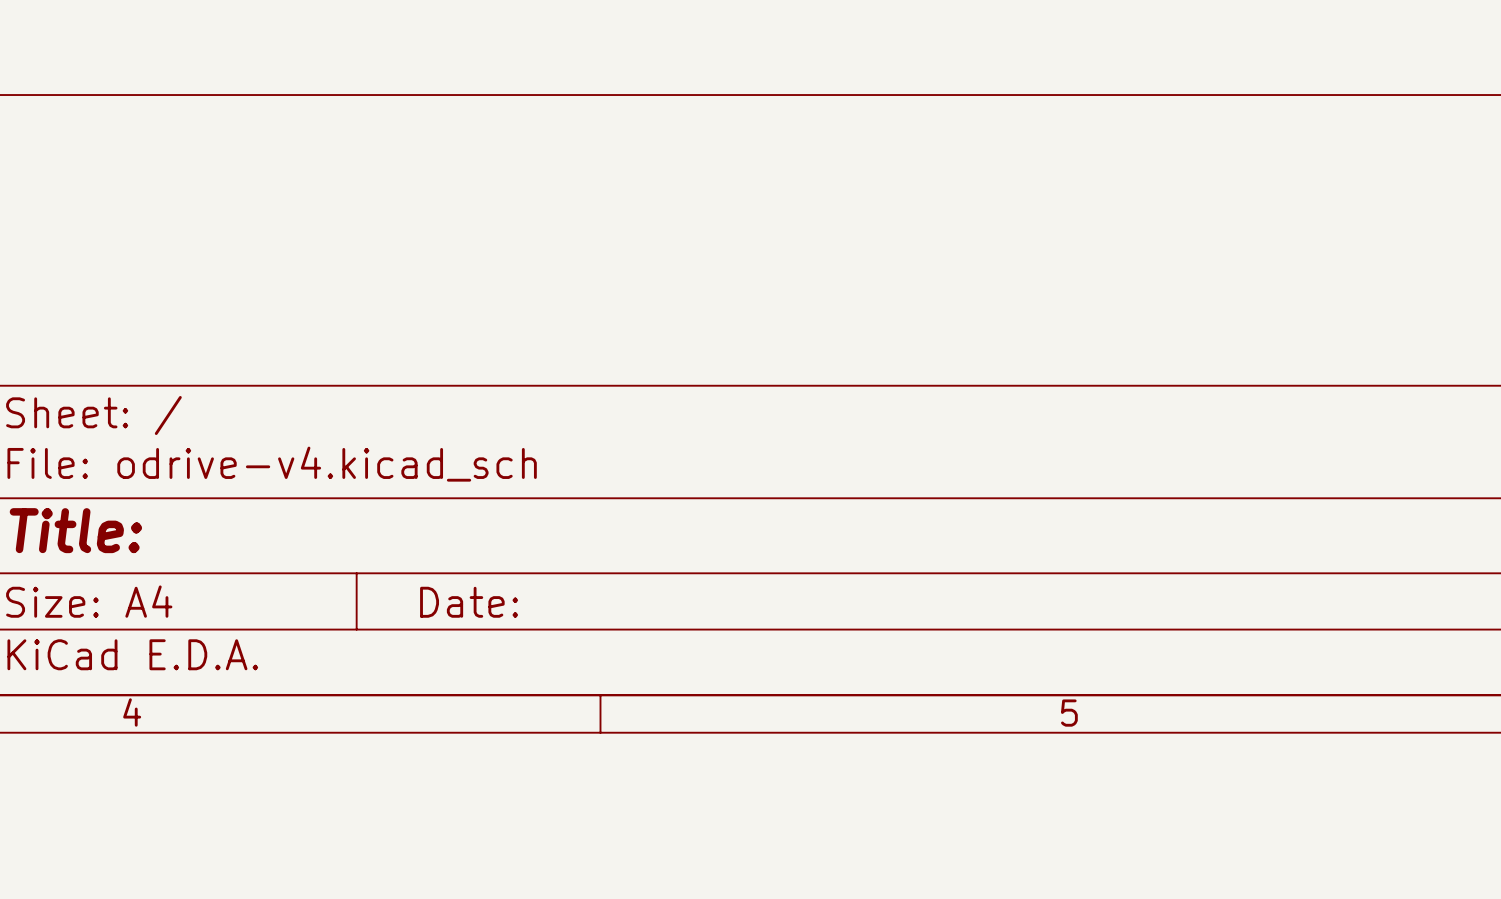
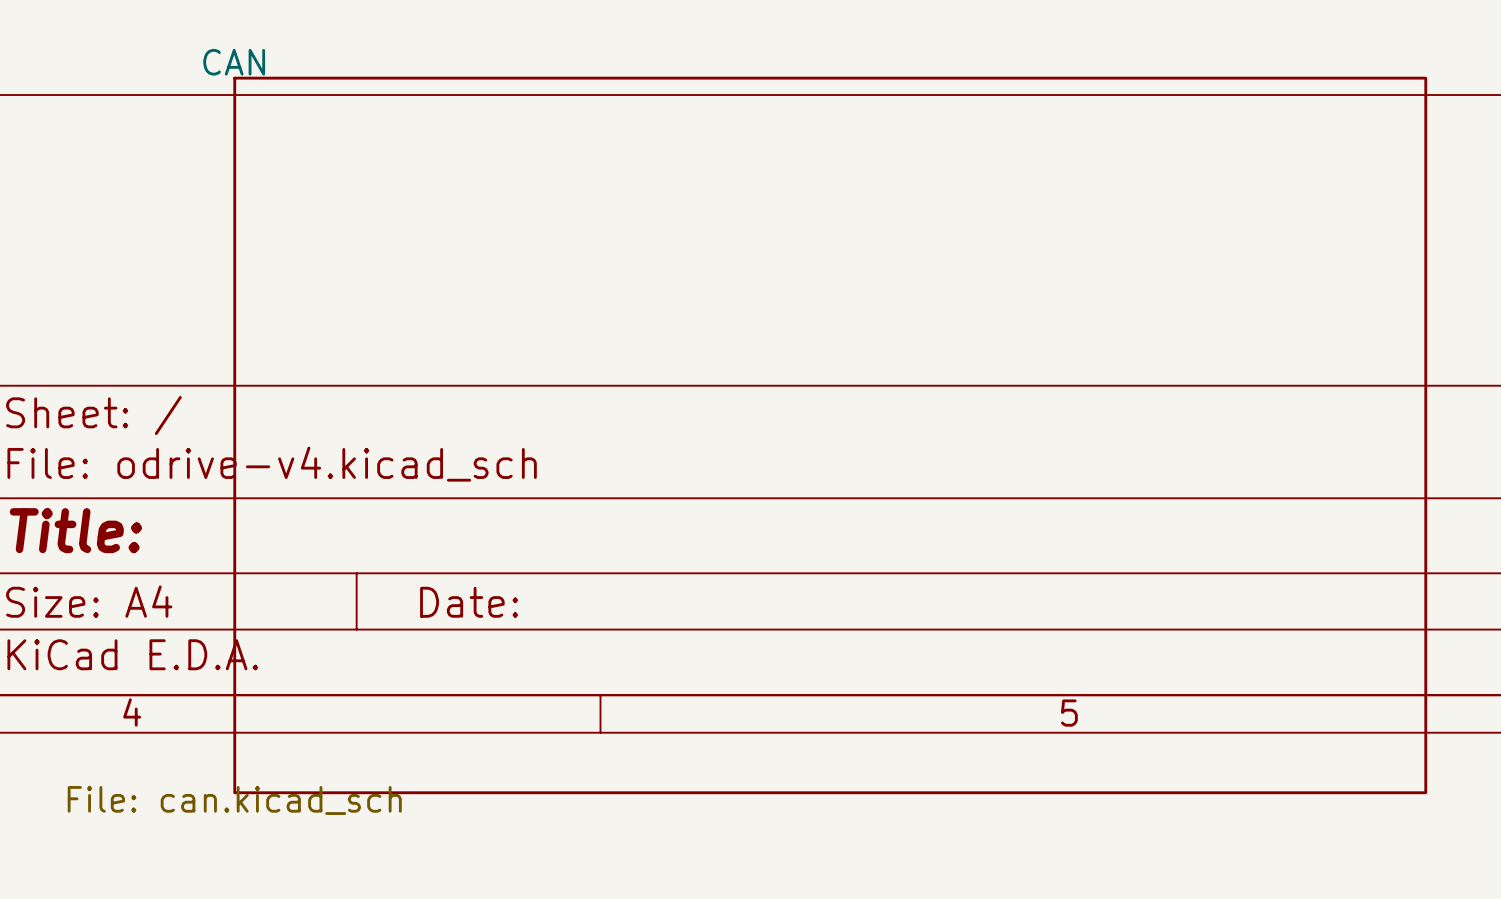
sheet CAN: none -> File: can.kicad_sch (830, 435)

